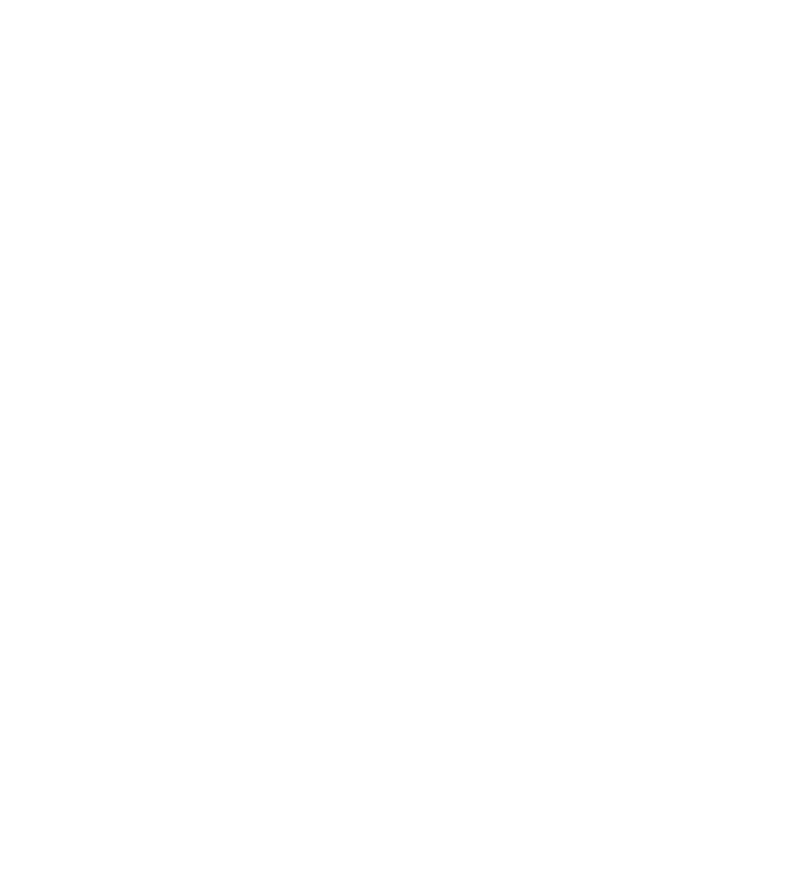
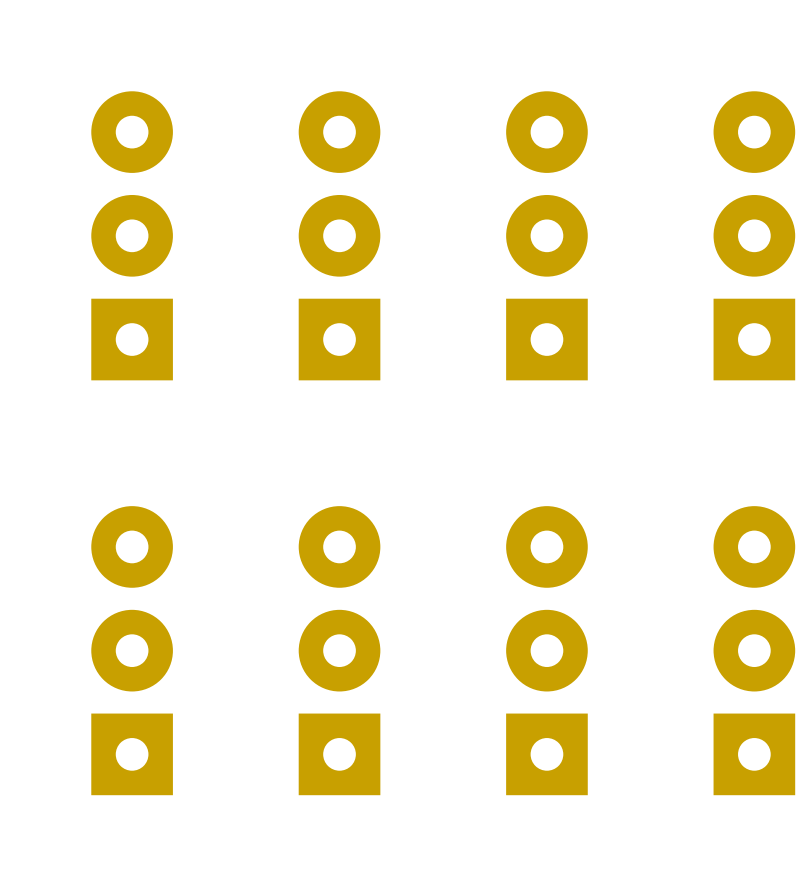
part: none -> (132, 235)
part: none -> (339, 235)
part: none -> (546, 235)
part: none -> (754, 235)
part: none -> (132, 650)
part: none -> (339, 650)
part: none -> (546, 650)
part: none -> (754, 650)

